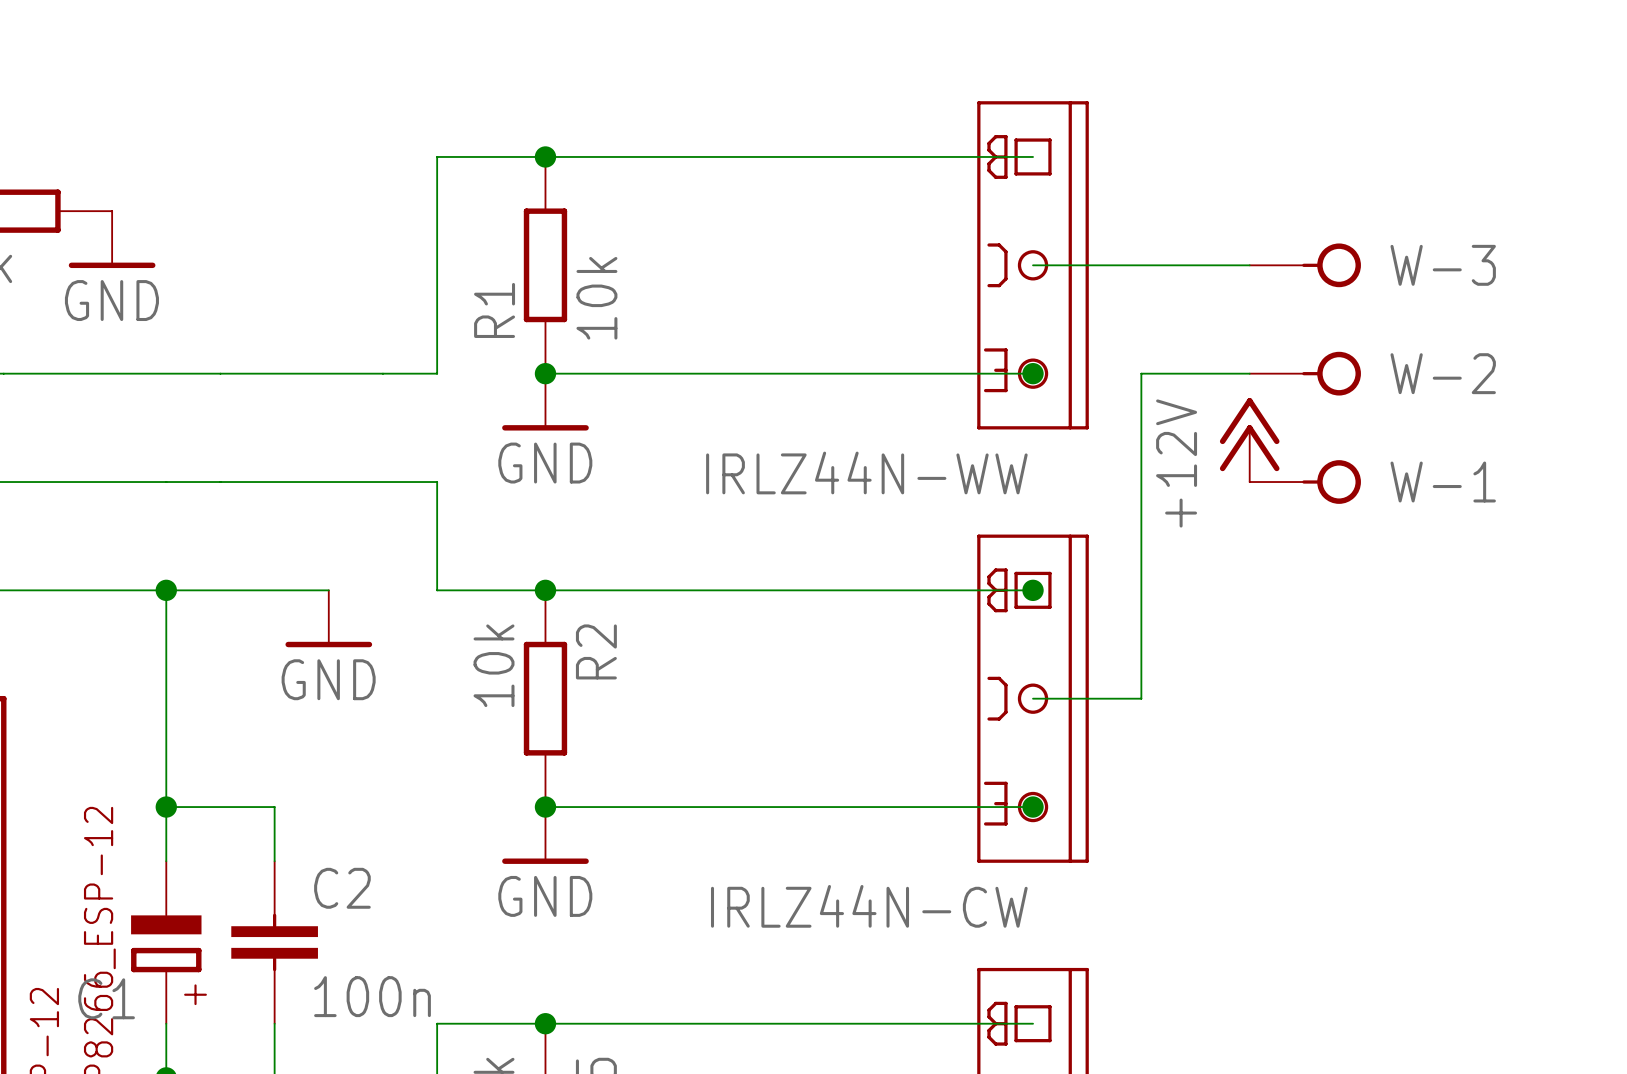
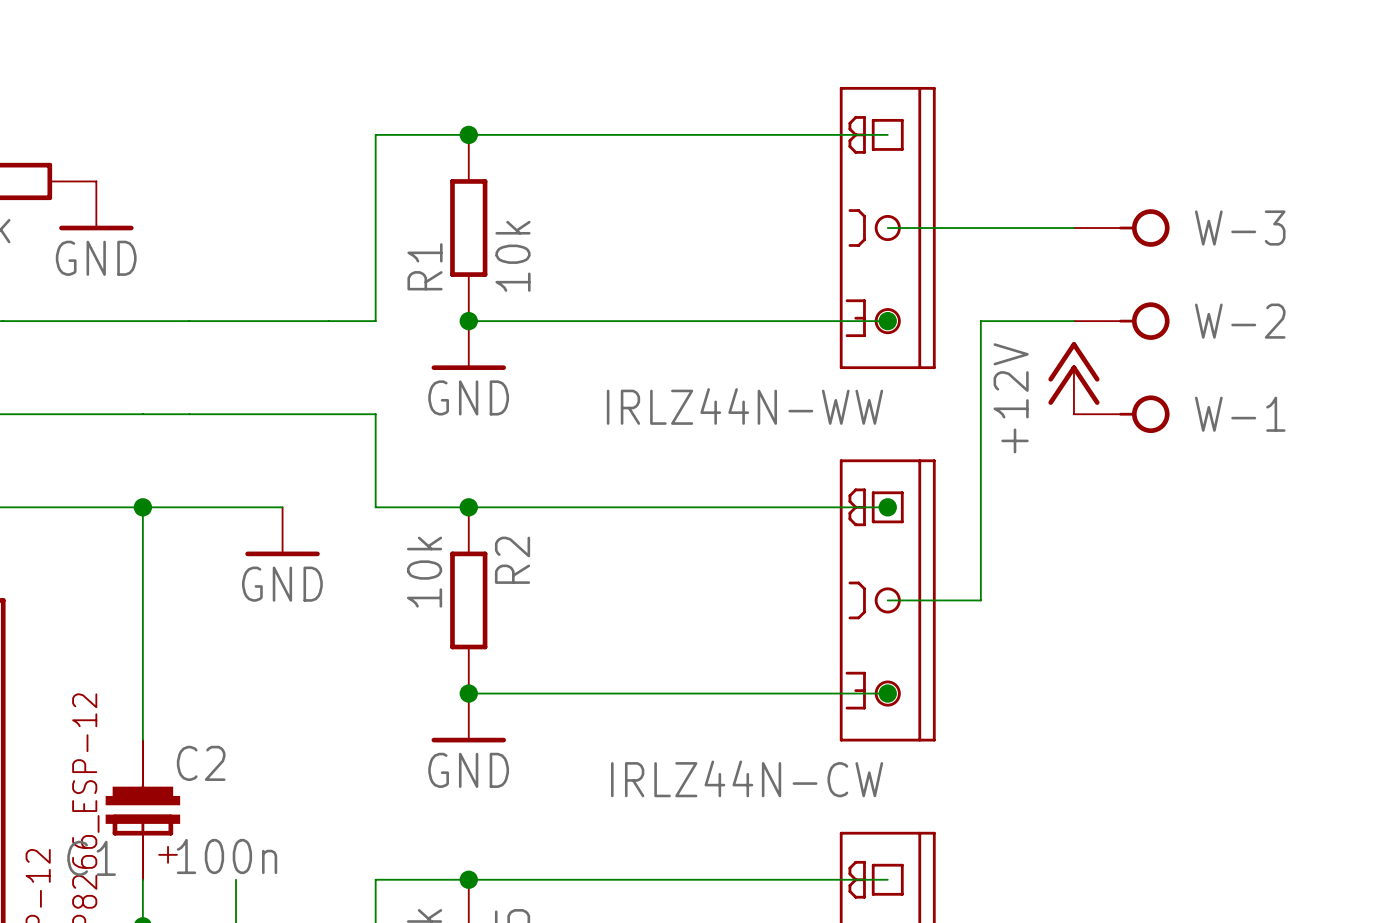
wire: (166, 807) (274, 807) (274, 861) -> none
junction: (166, 807) -> none
C2 position: (274, 942) -> (142, 809)

